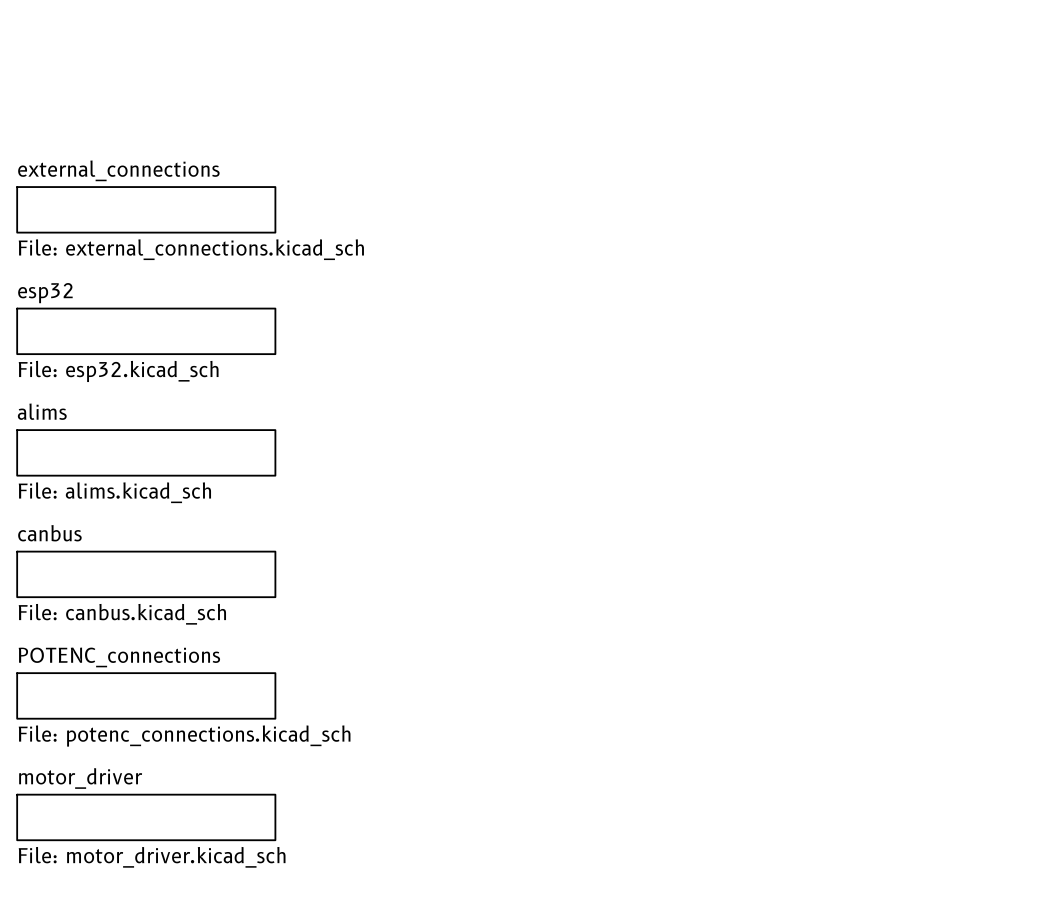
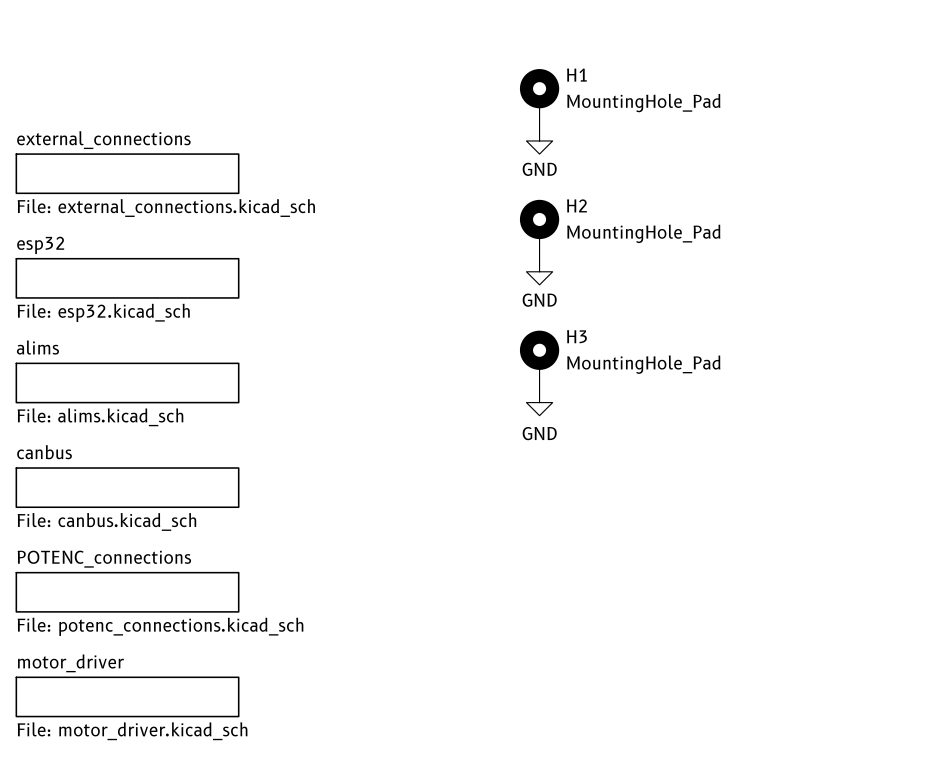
H1: none -> MountingHole_Pad (539, 98)
power symbol: none -> GND (539, 140)
H2: none -> MountingHole_Pad (539, 229)
power symbol: none -> GND (539, 271)
H3: none -> MountingHole_Pad (539, 360)
power symbol: none -> GND (539, 402)

